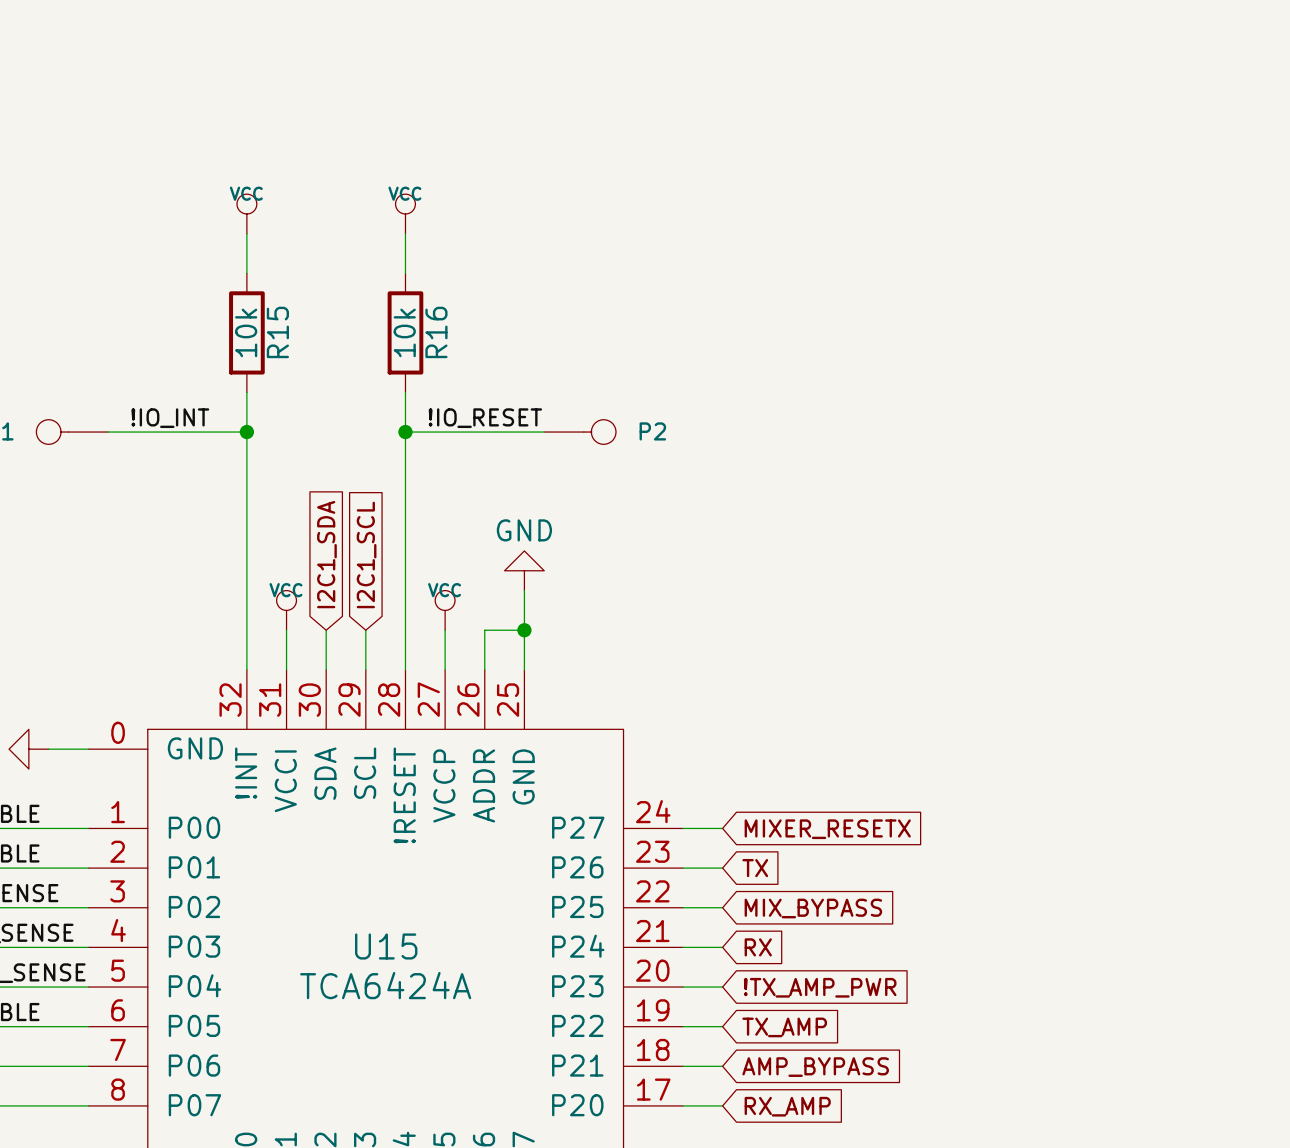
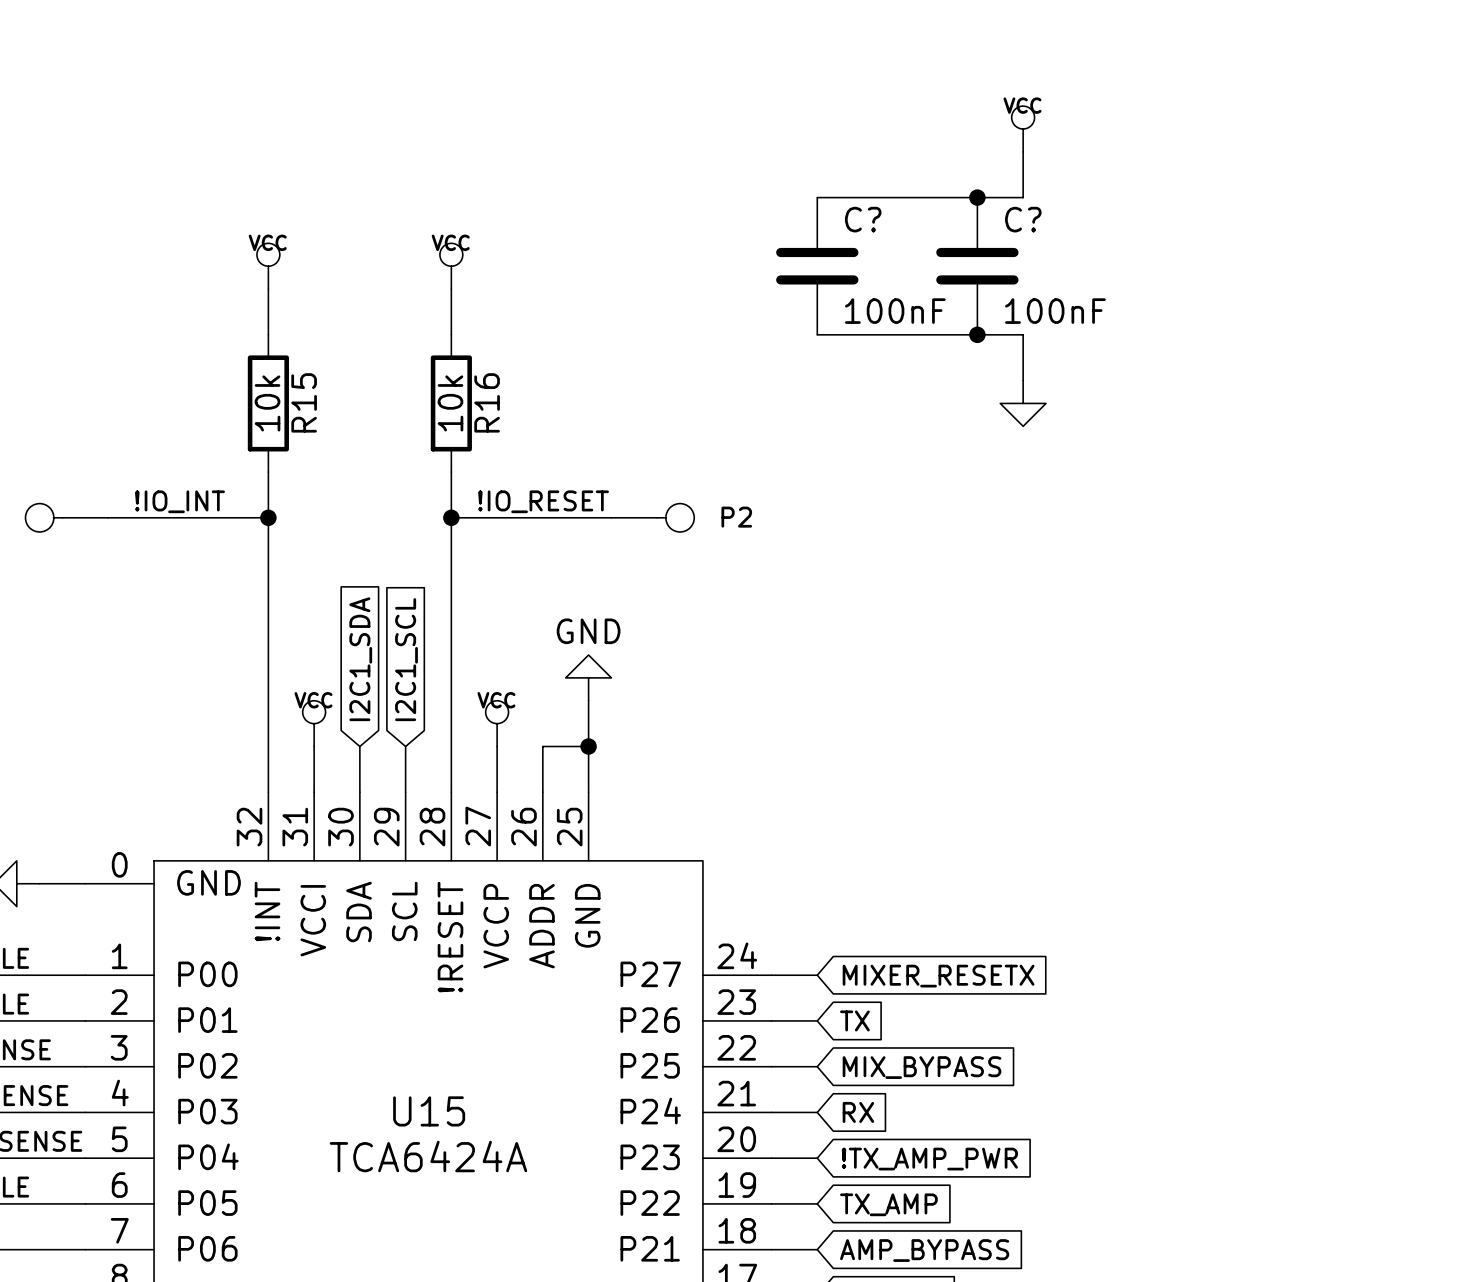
power symbol: none -> VCC (1023, 128)
wire: none -> (1023, 151) (1023, 197) (817, 197)
junction: none -> (977, 197)
C?: none -> 100nF (817, 266)
C?: none -> 100nF (977, 266)
wire: none -> (817, 334) (1023, 334) (1023, 380)
junction: none -> (977, 334)
power symbol: none -> (1023, 403)

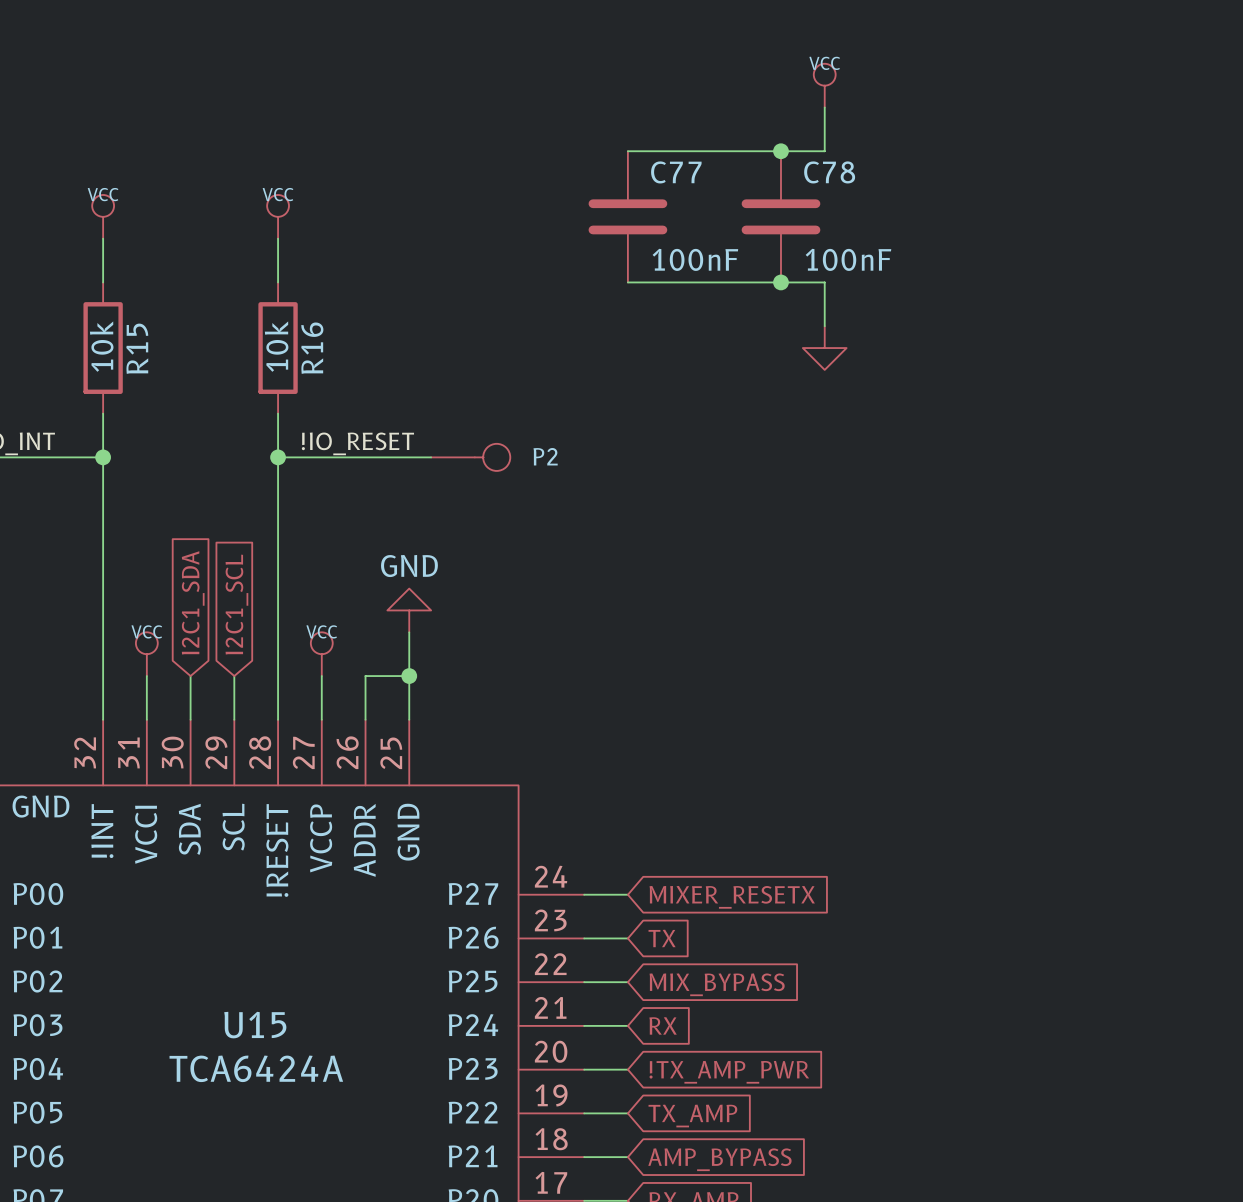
C? name: C? (863, 219) -> C77 (676, 172)
C? name: C? (1023, 219) -> C78 (829, 172)

